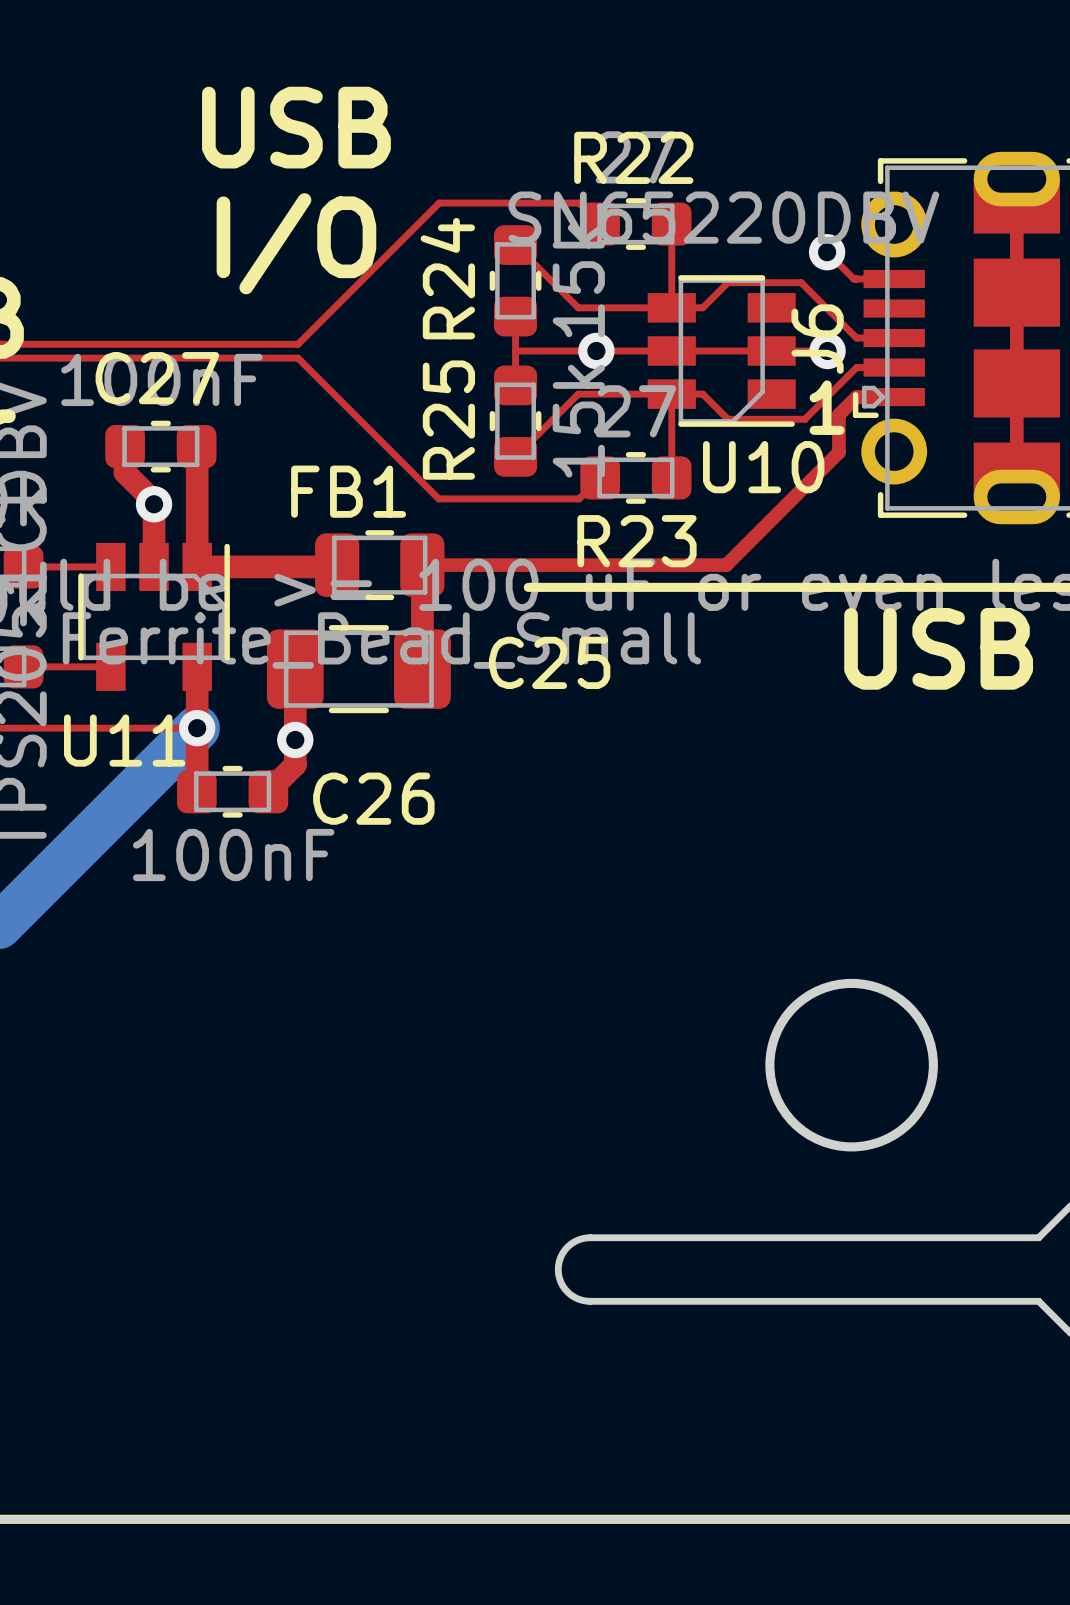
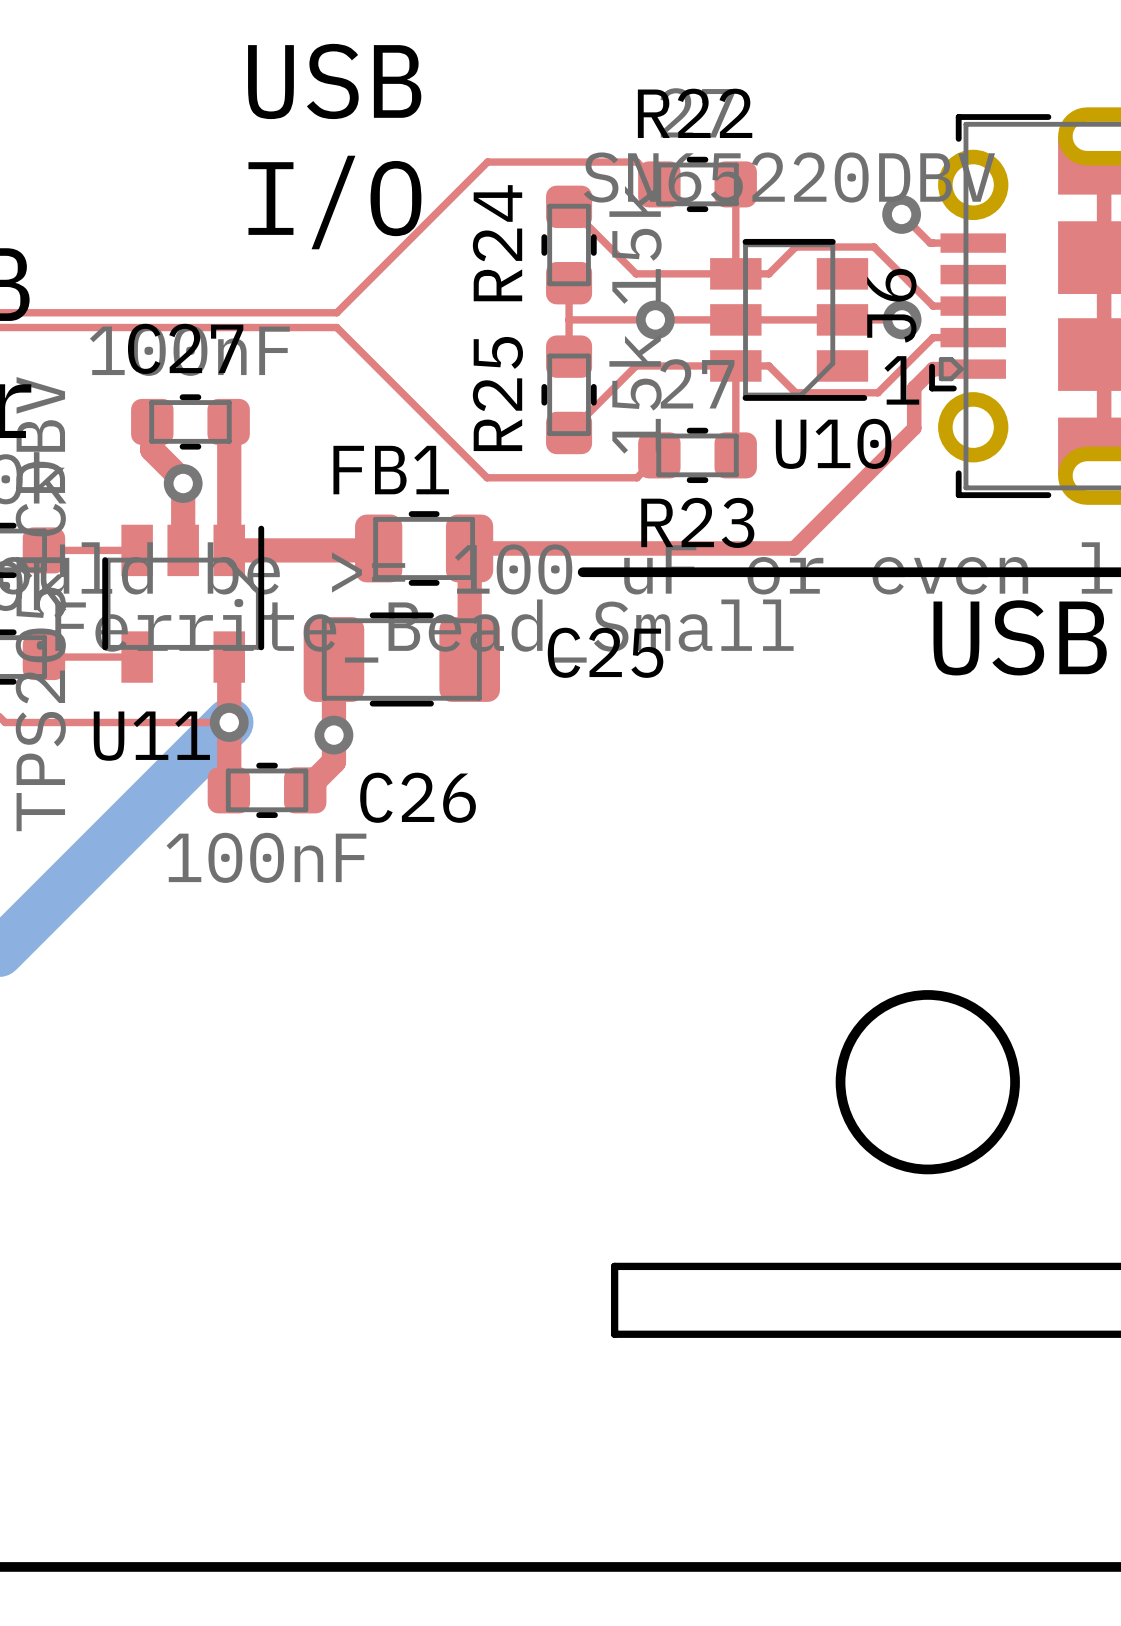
board edge: (590, 1237) (577, 1240) (567, 1247) (560, 1257) (558, 1269) (560, 1281) (567, 1292) (577, 1298) (590, 1301) -> (648, 1266) (614, 1266) (614, 1334) (648, 1334)

